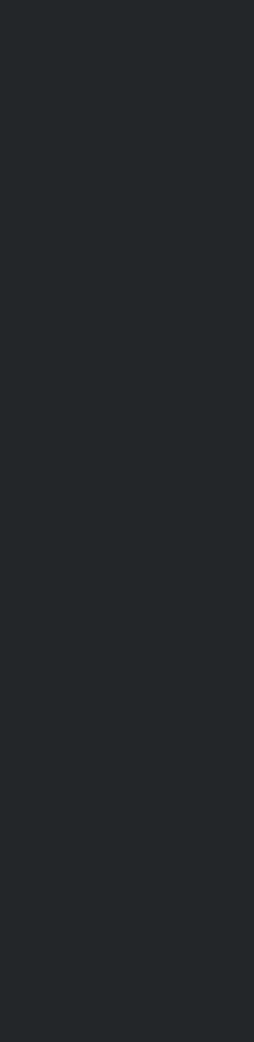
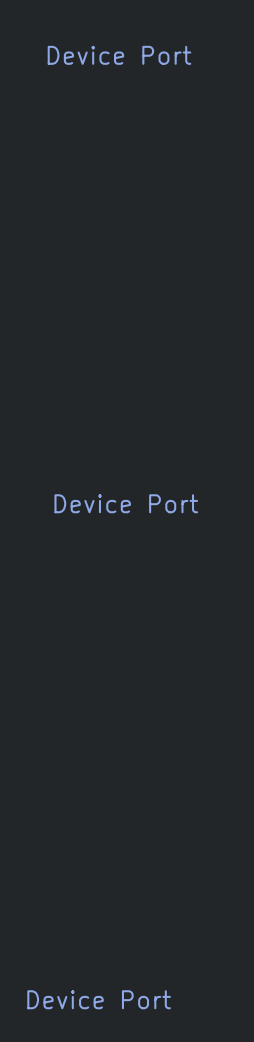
text: none -> Device Port (119, 55)
text: none -> Device Port (126, 503)
text: none -> Device Port (99, 999)

